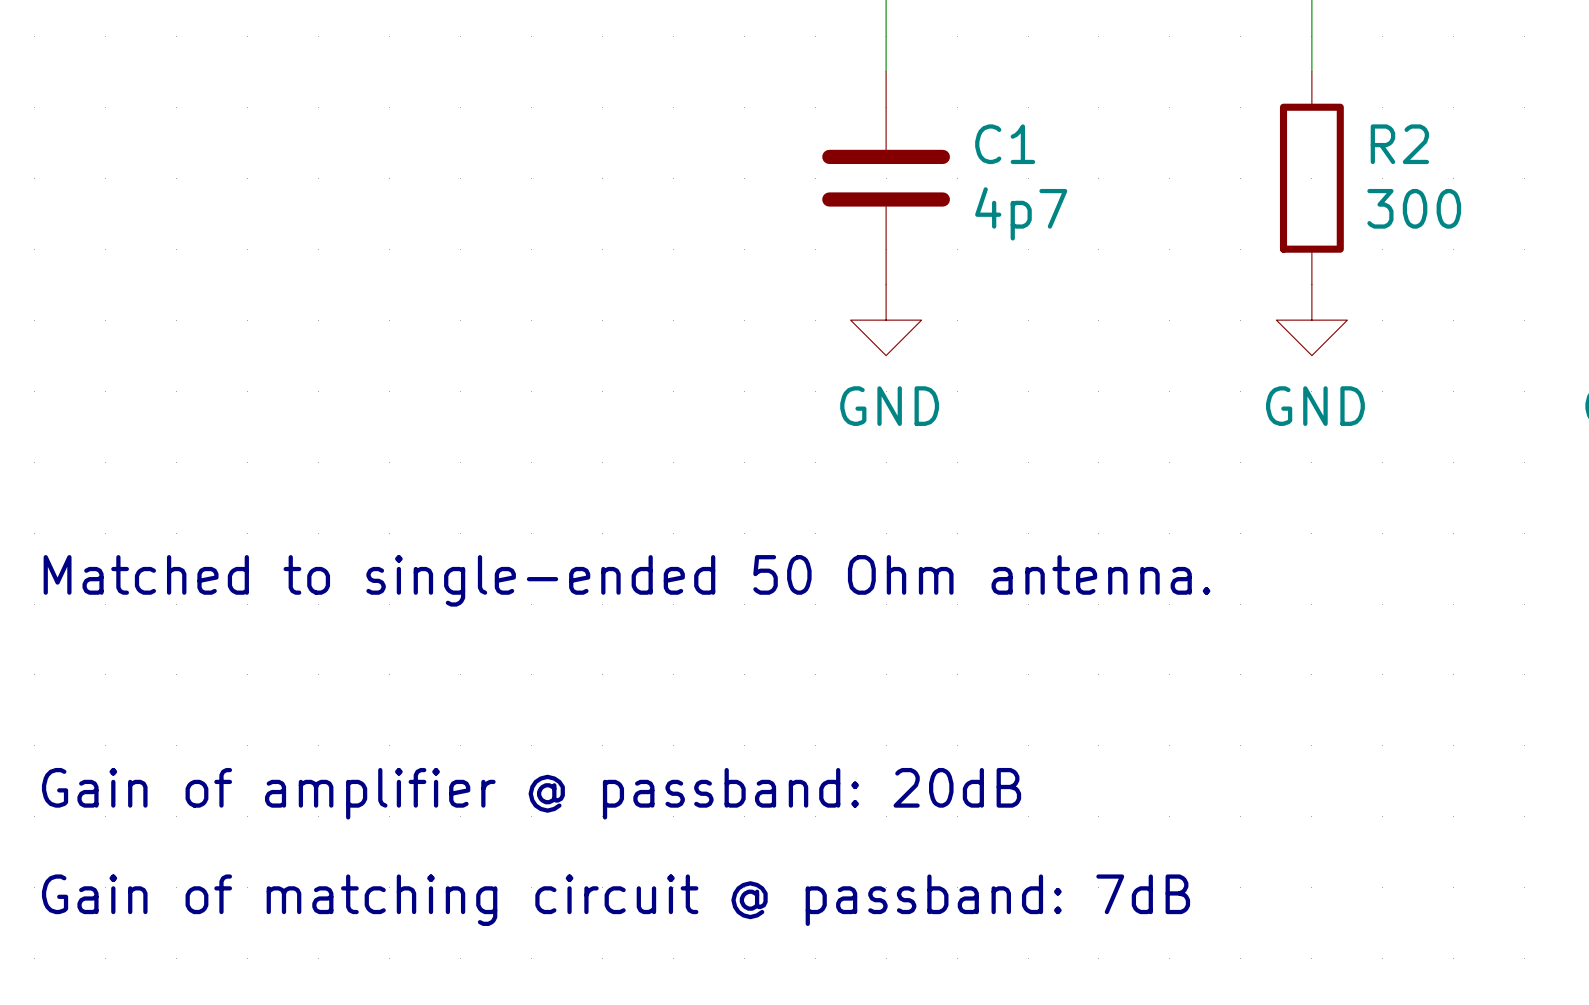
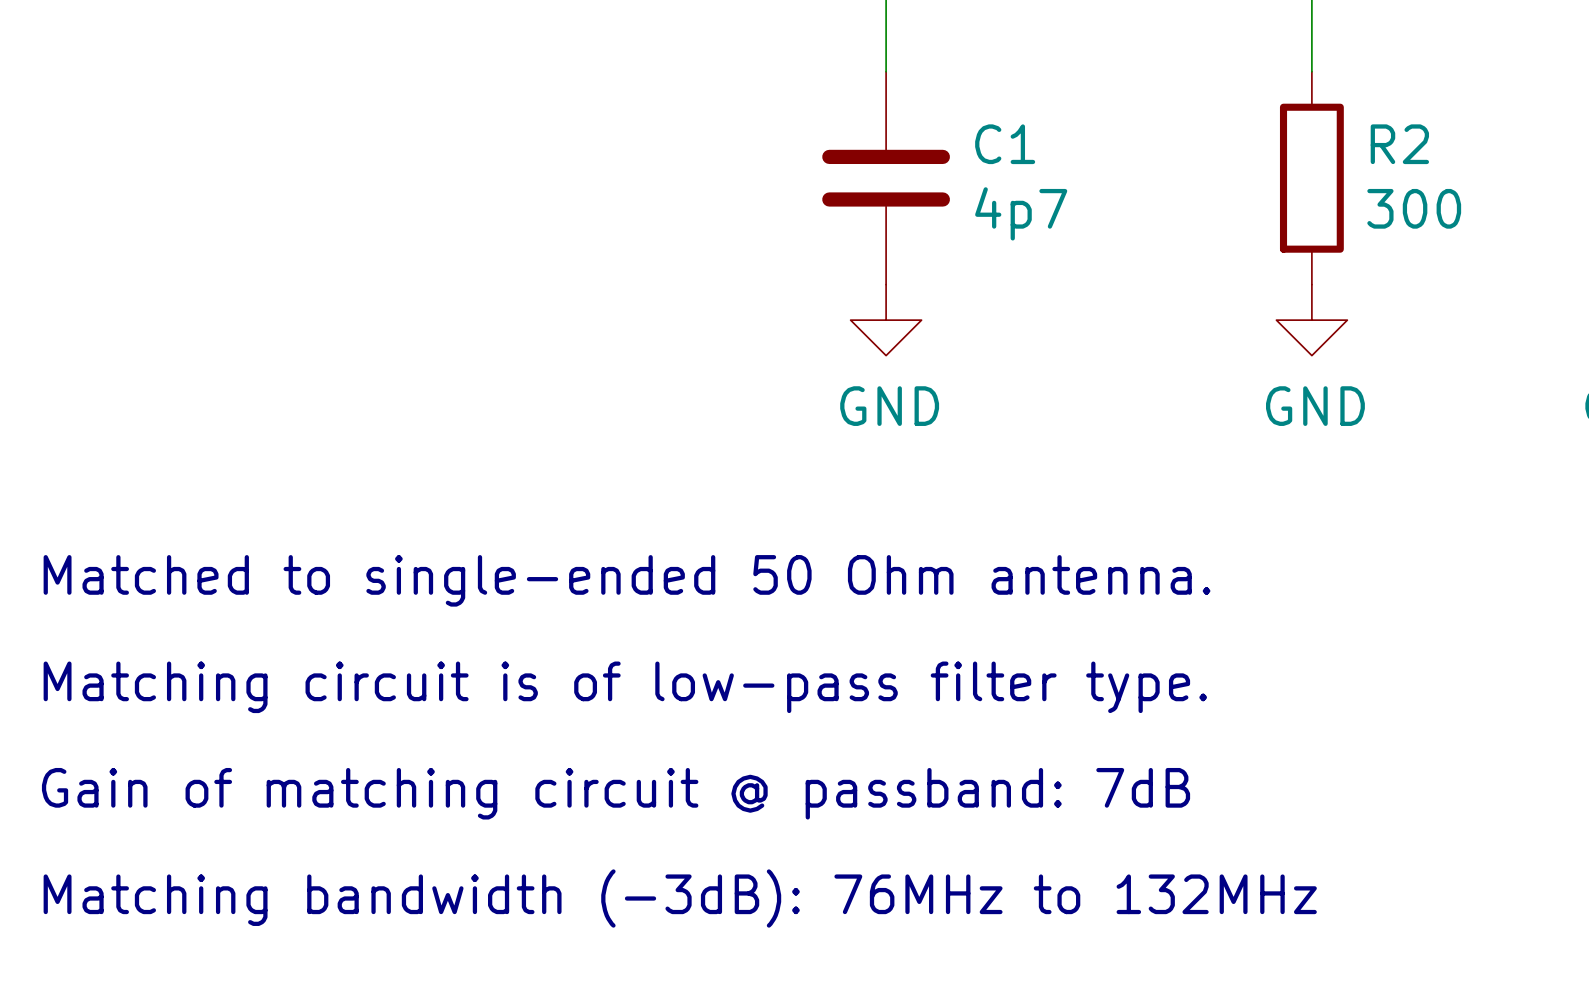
text: none -> Matching circuit is of low-pass filter type. (625, 687)
text: Gain of amplifier @ passband: 20dB (531, 793) -> Gain of matching circuit @ passband: 7dB (616, 793)
text: Gain of matching circuit @ passband: 7dB (616, 900) -> Matching bandwidth (-3dB): 76MHz to 132MHz (680, 898)

